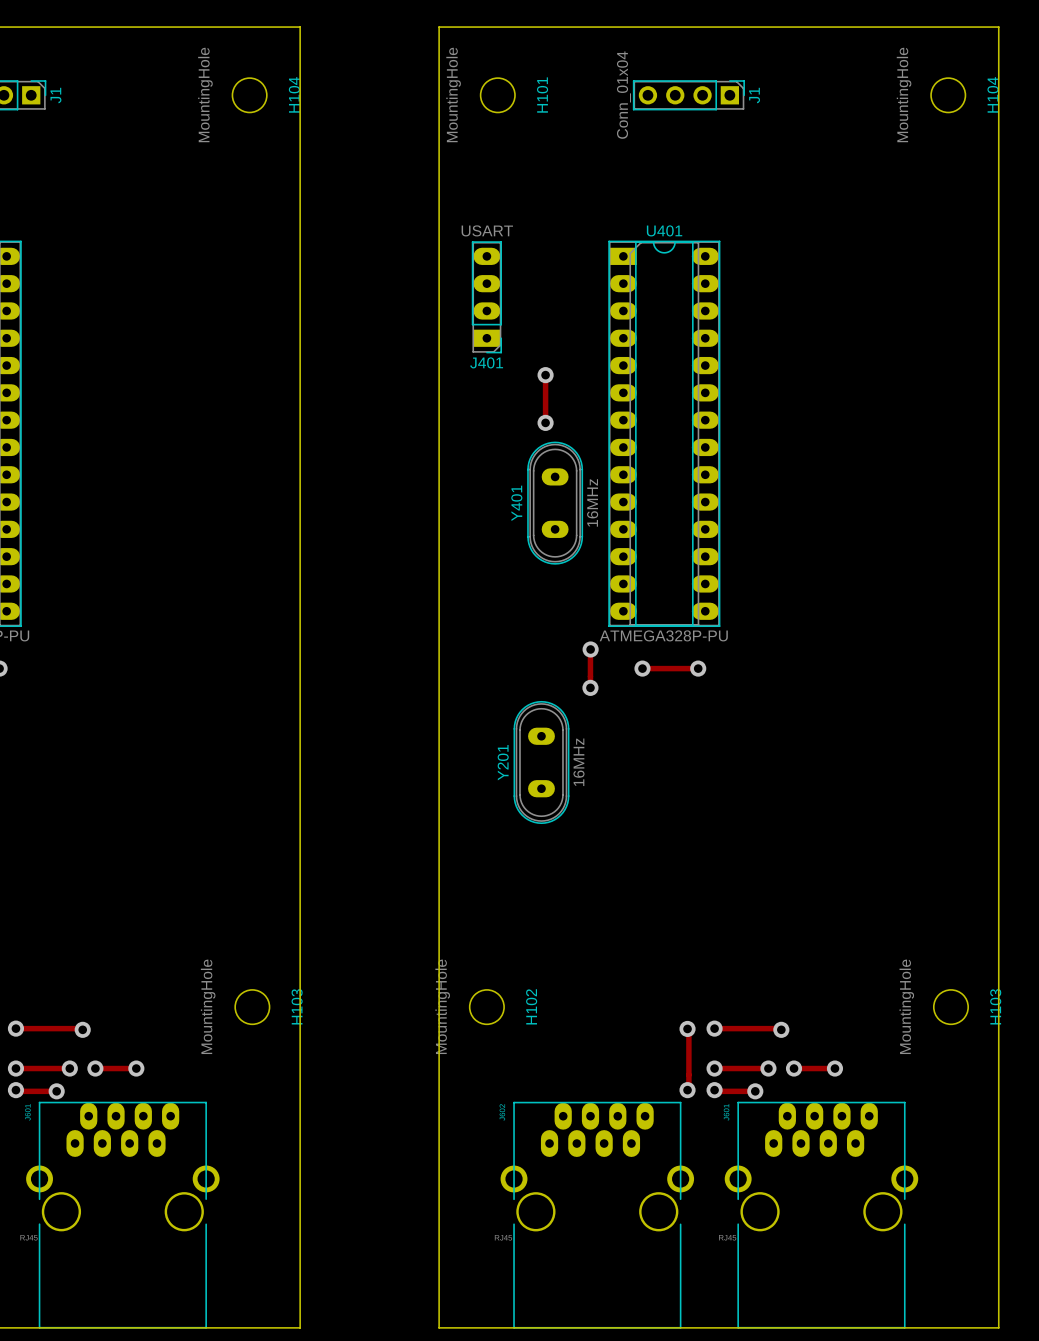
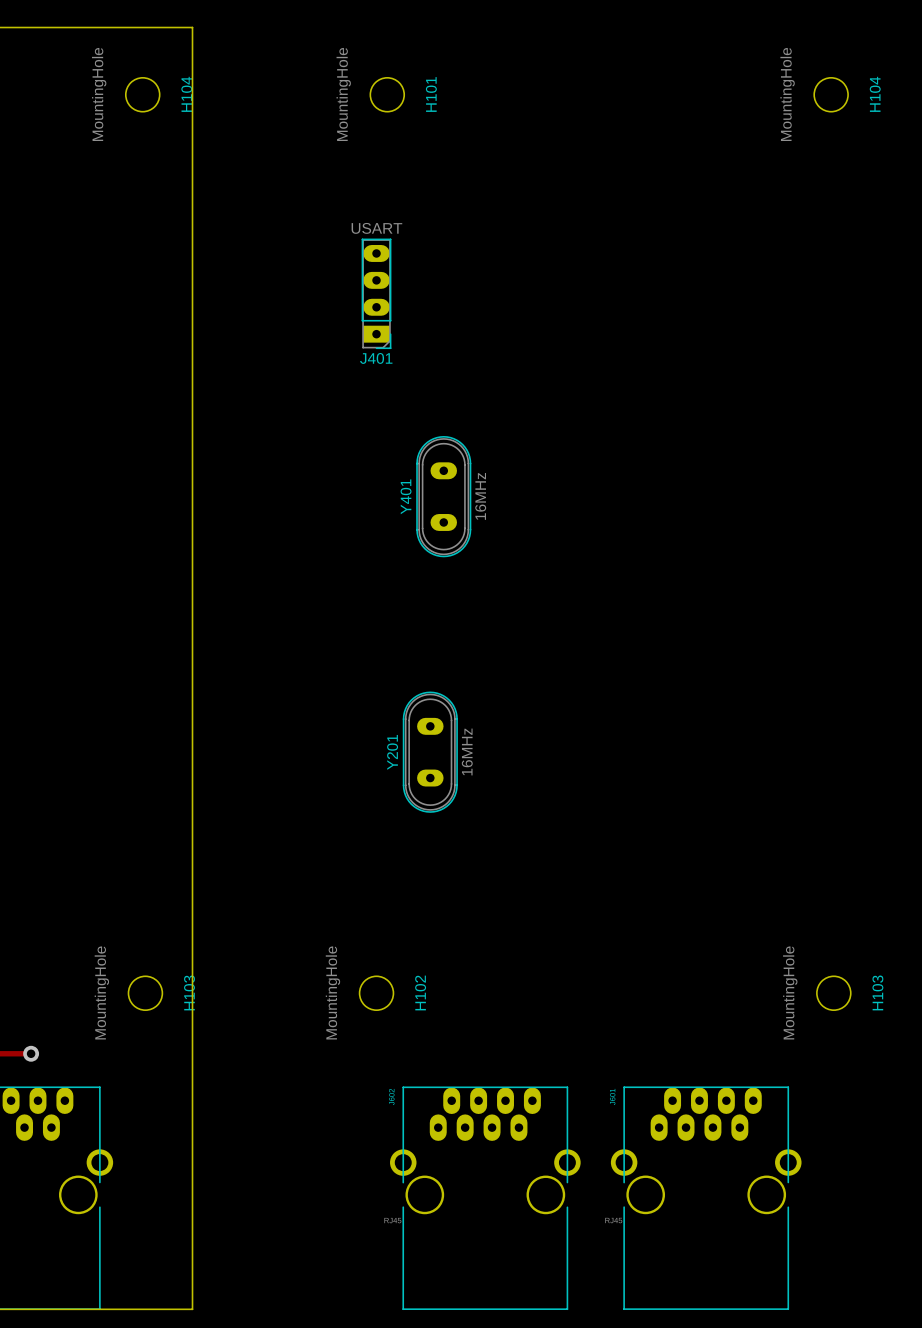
board edge: (439, 27) (998, 27) (998, 1327) (439, 1327) (439, 27) -> none
J1: Conn_01x04 (688, 95) -> none
track: (545, 375) (545, 422) -> none
via: (545, 375) -> none
via: (545, 422) -> none
U401: ATMEGA328P-PU (664, 433) -> none
track: (590, 649) (590, 687) -> none
via: (590, 649) -> none
track: (642, 668) (698, 668) -> none
via: (642, 668) -> none
via: (698, 668) -> none
via: (590, 687) -> none
track: (687, 1026) (688, 1086) -> none
via: (687, 1028) -> none
track: (714, 1028) (781, 1029) -> none
via: (714, 1028) -> none
via: (781, 1029) -> none
track: (714, 1068) (768, 1068) -> none
via: (714, 1068) -> none
via: (768, 1068) -> none
track: (794, 1068) (834, 1068) -> none
via: (794, 1068) -> none
via: (834, 1068) -> none
via: (687, 1090) -> none
track: (714, 1090) (755, 1091) -> none
via: (714, 1090) -> none
via: (755, 1091) -> none

